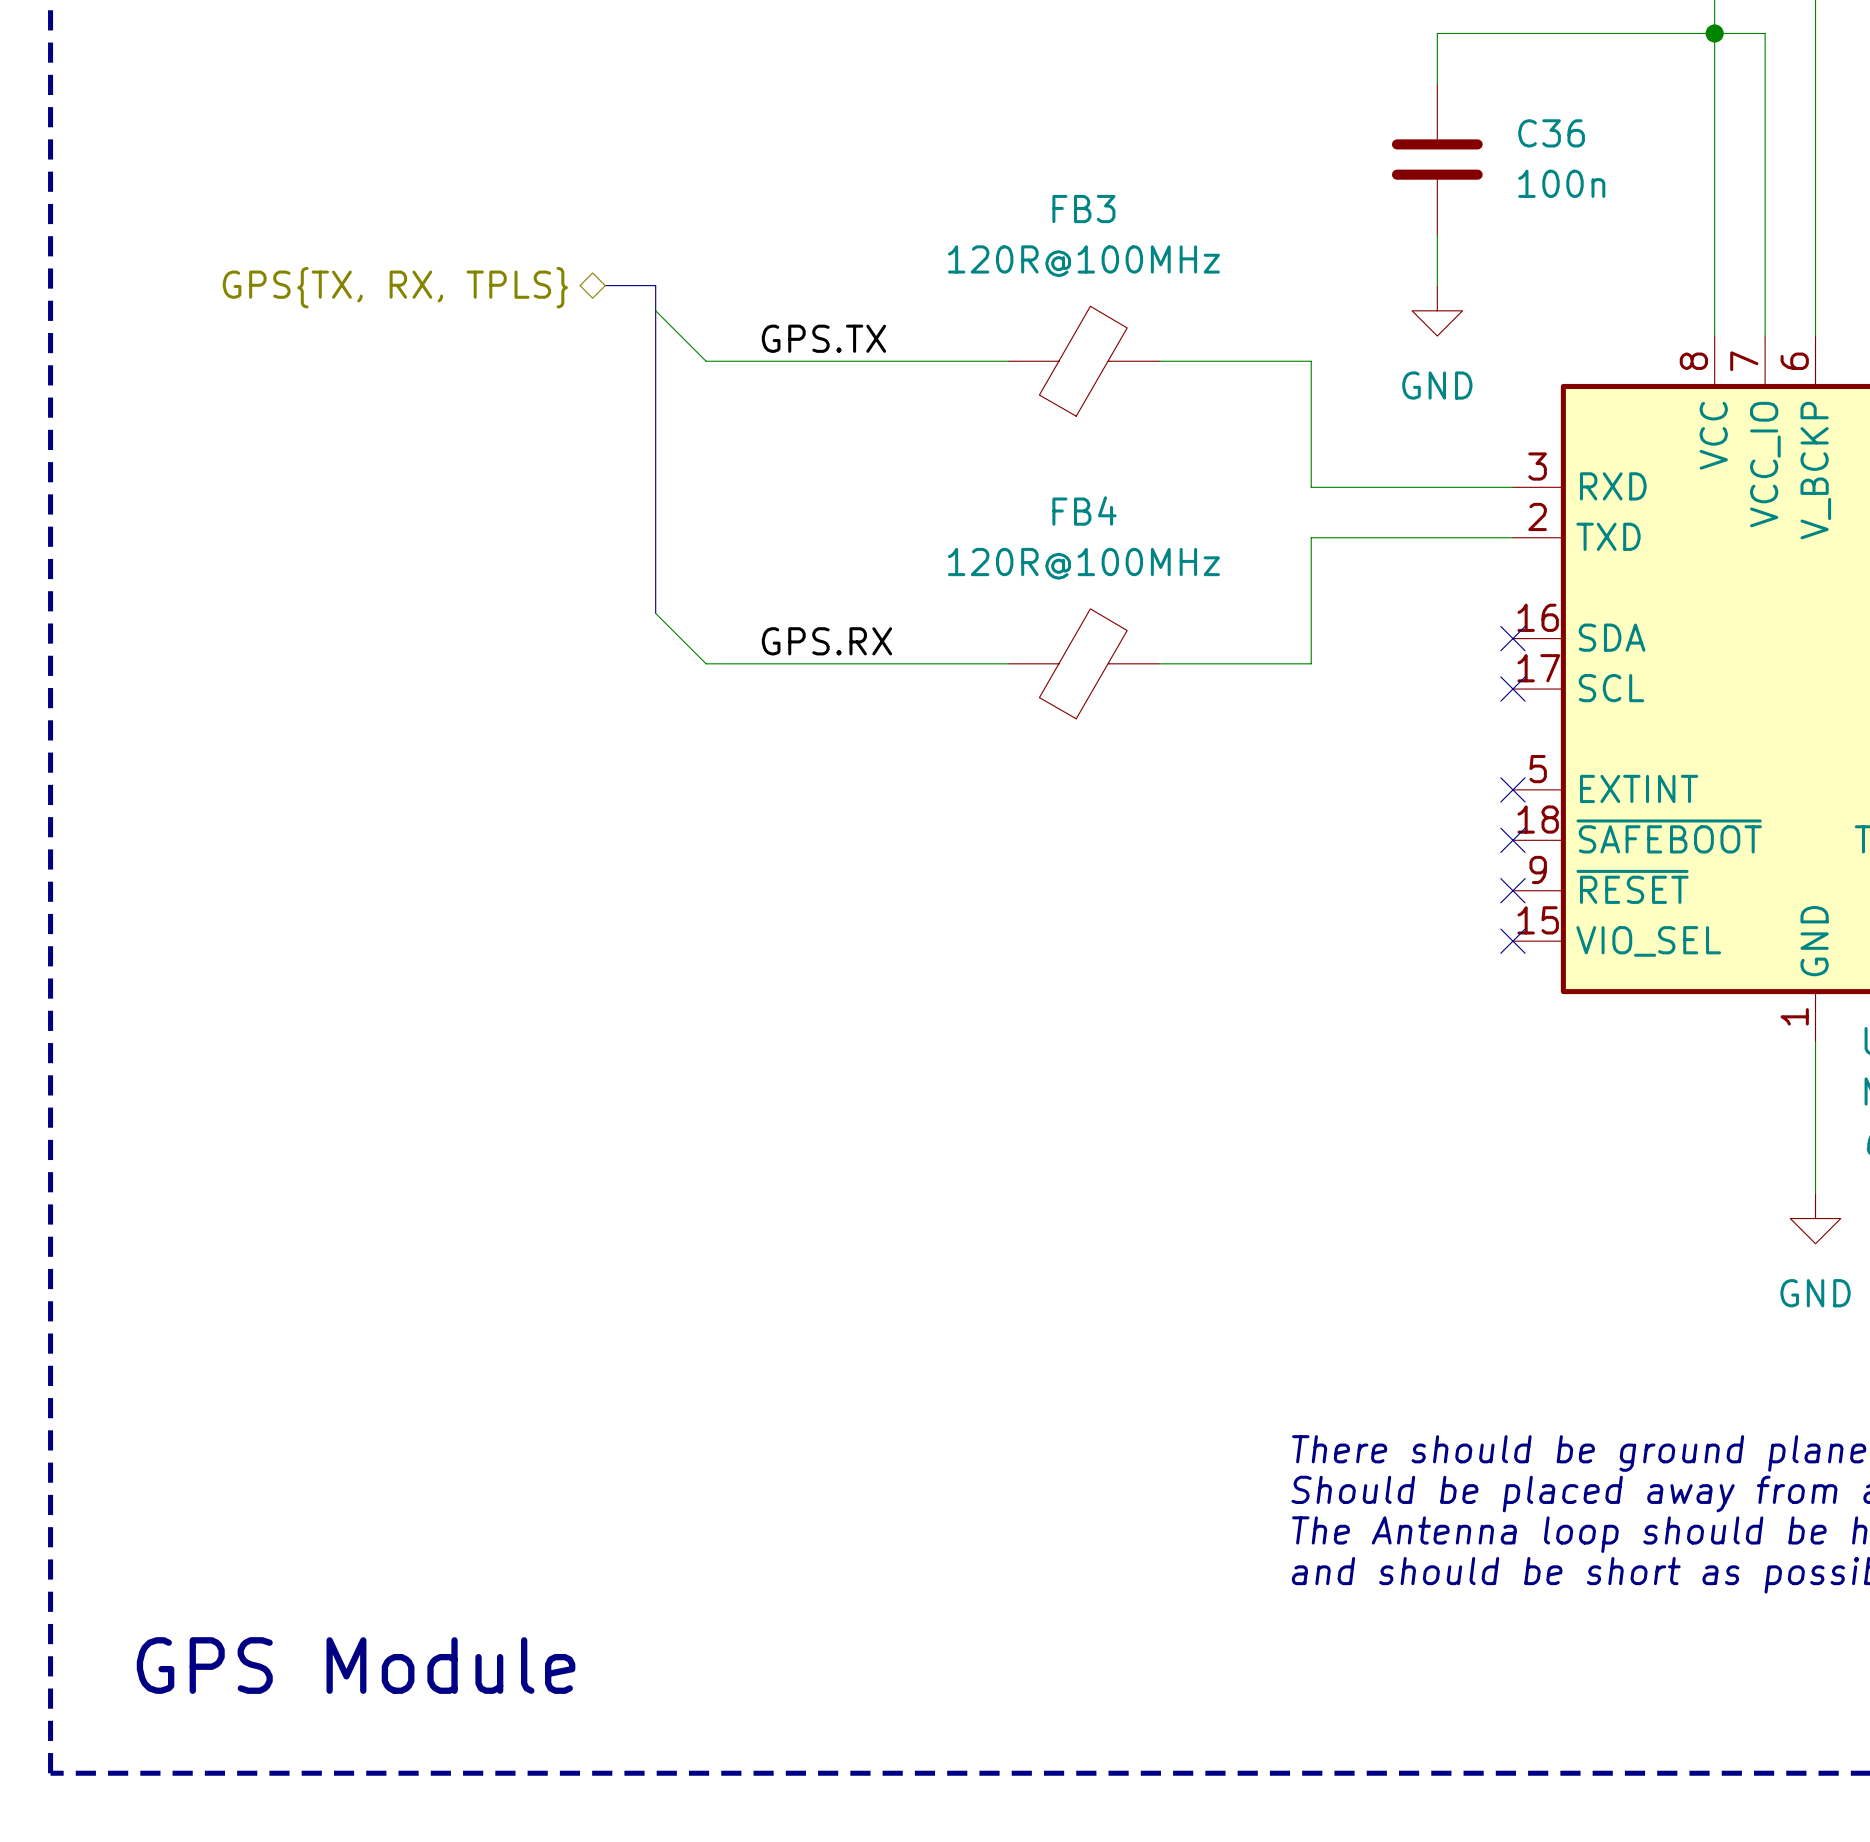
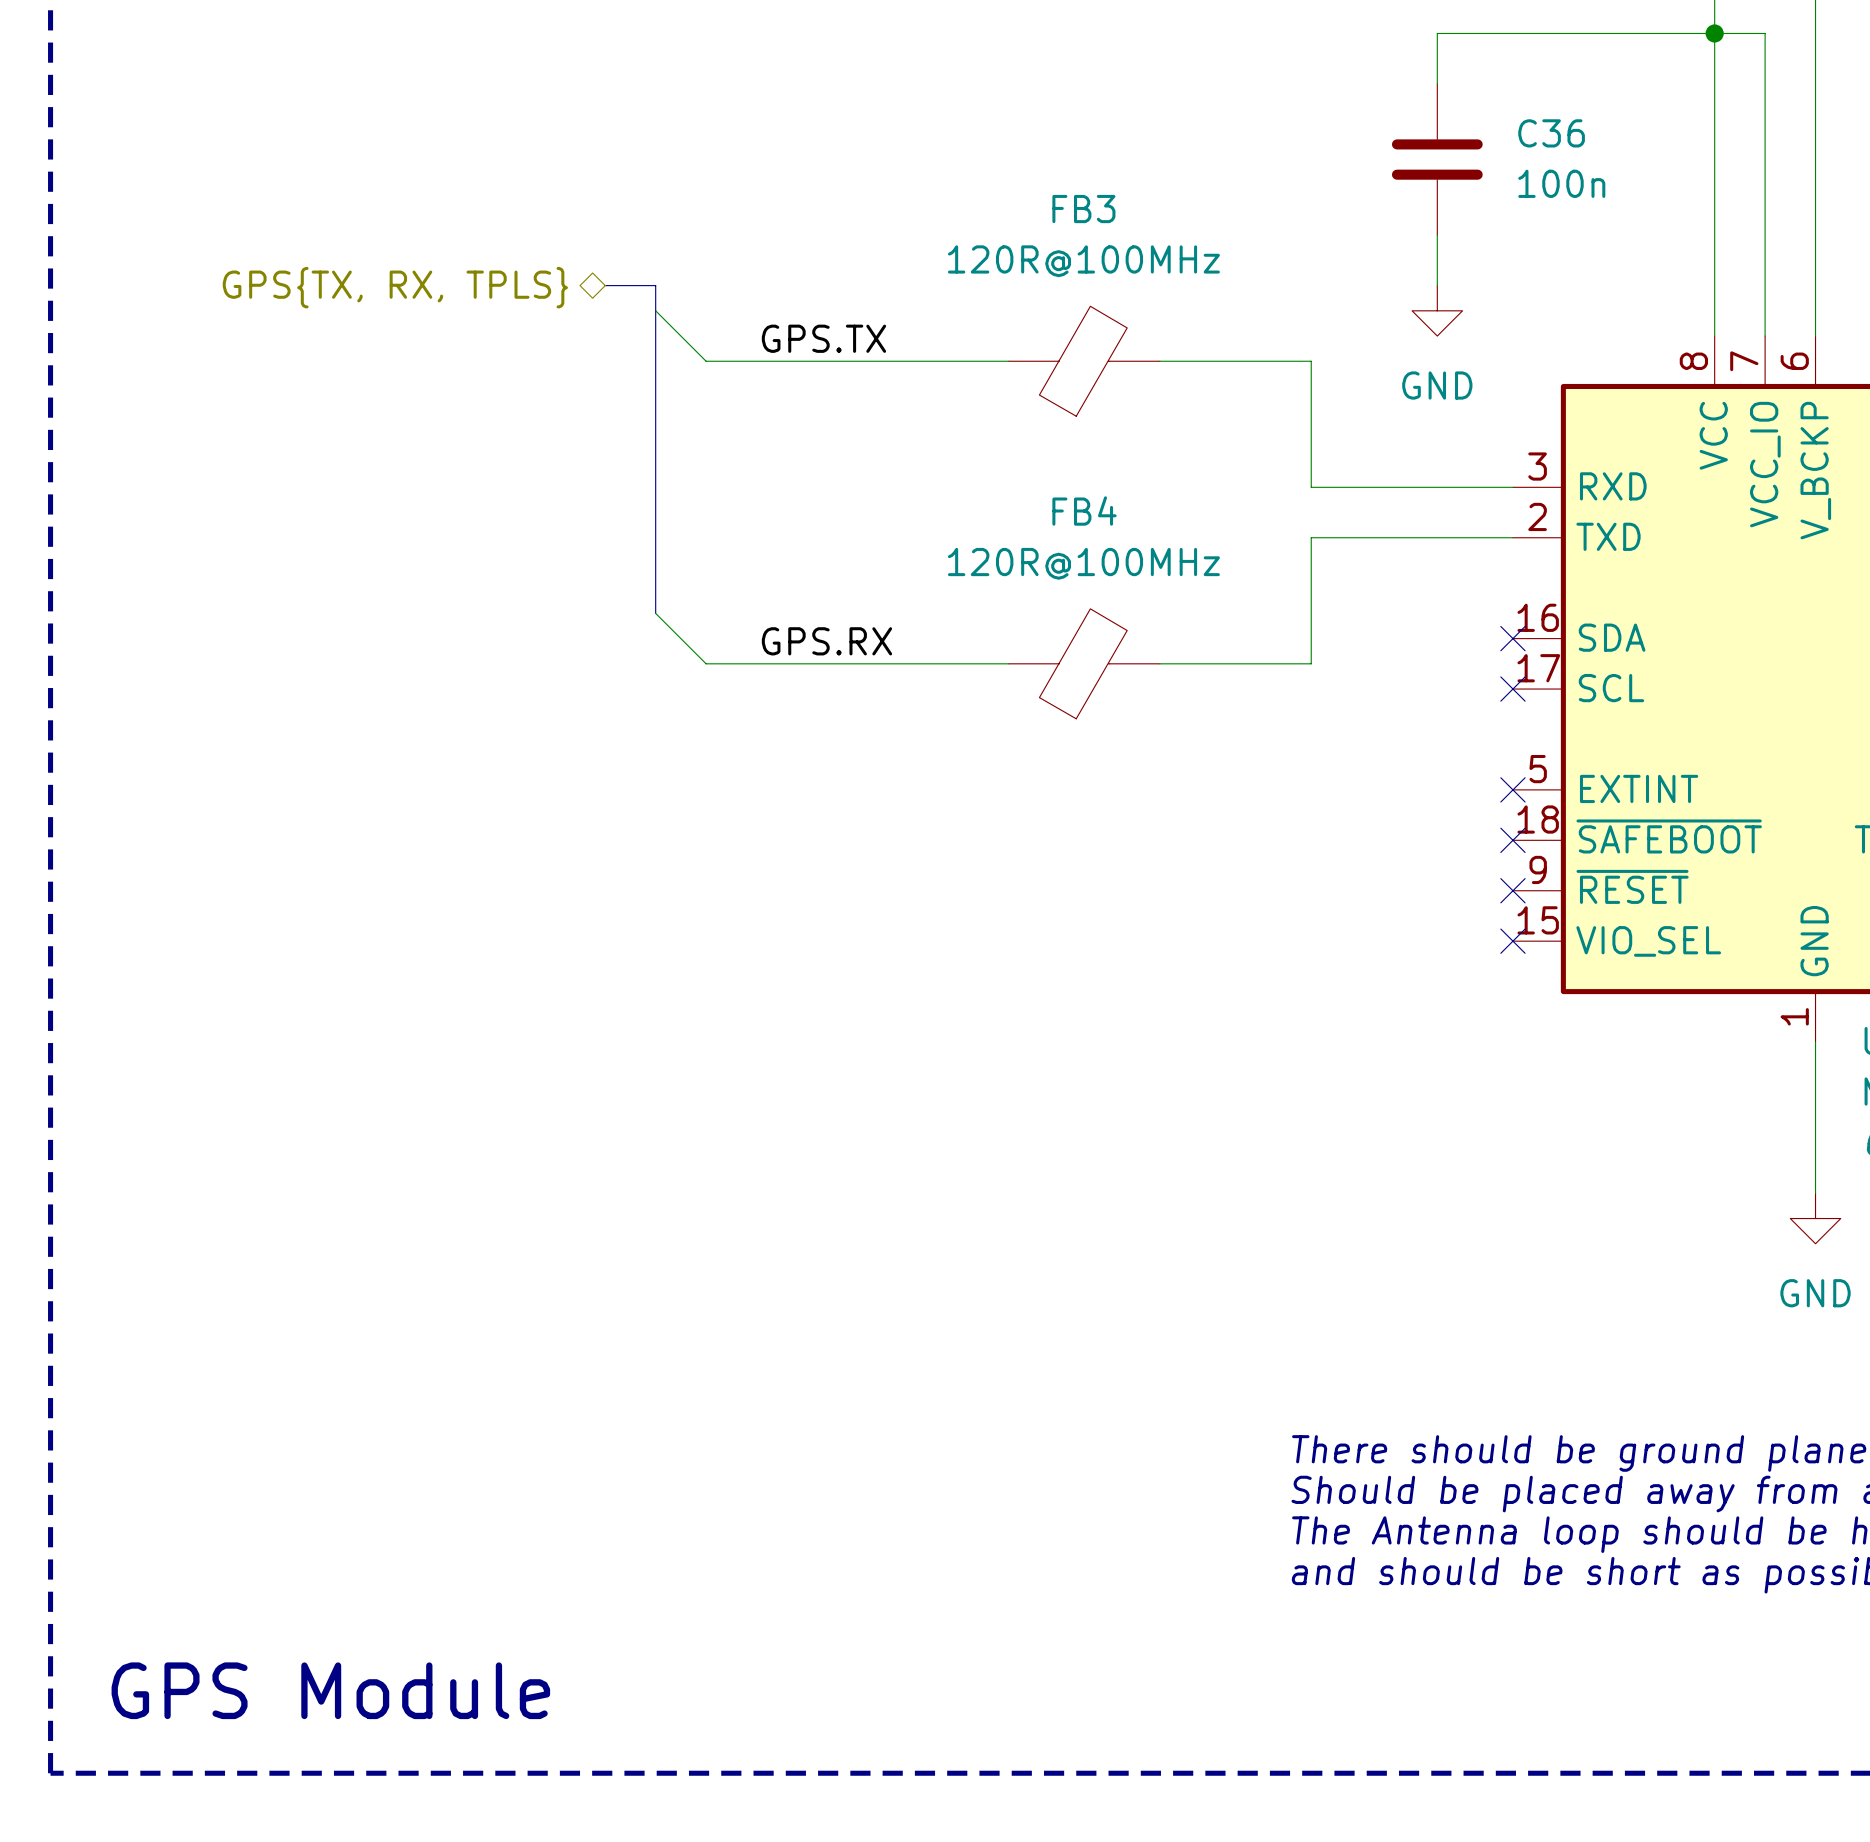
text position: GPS Module (356, 1665) -> GPS Module (330, 1690)

